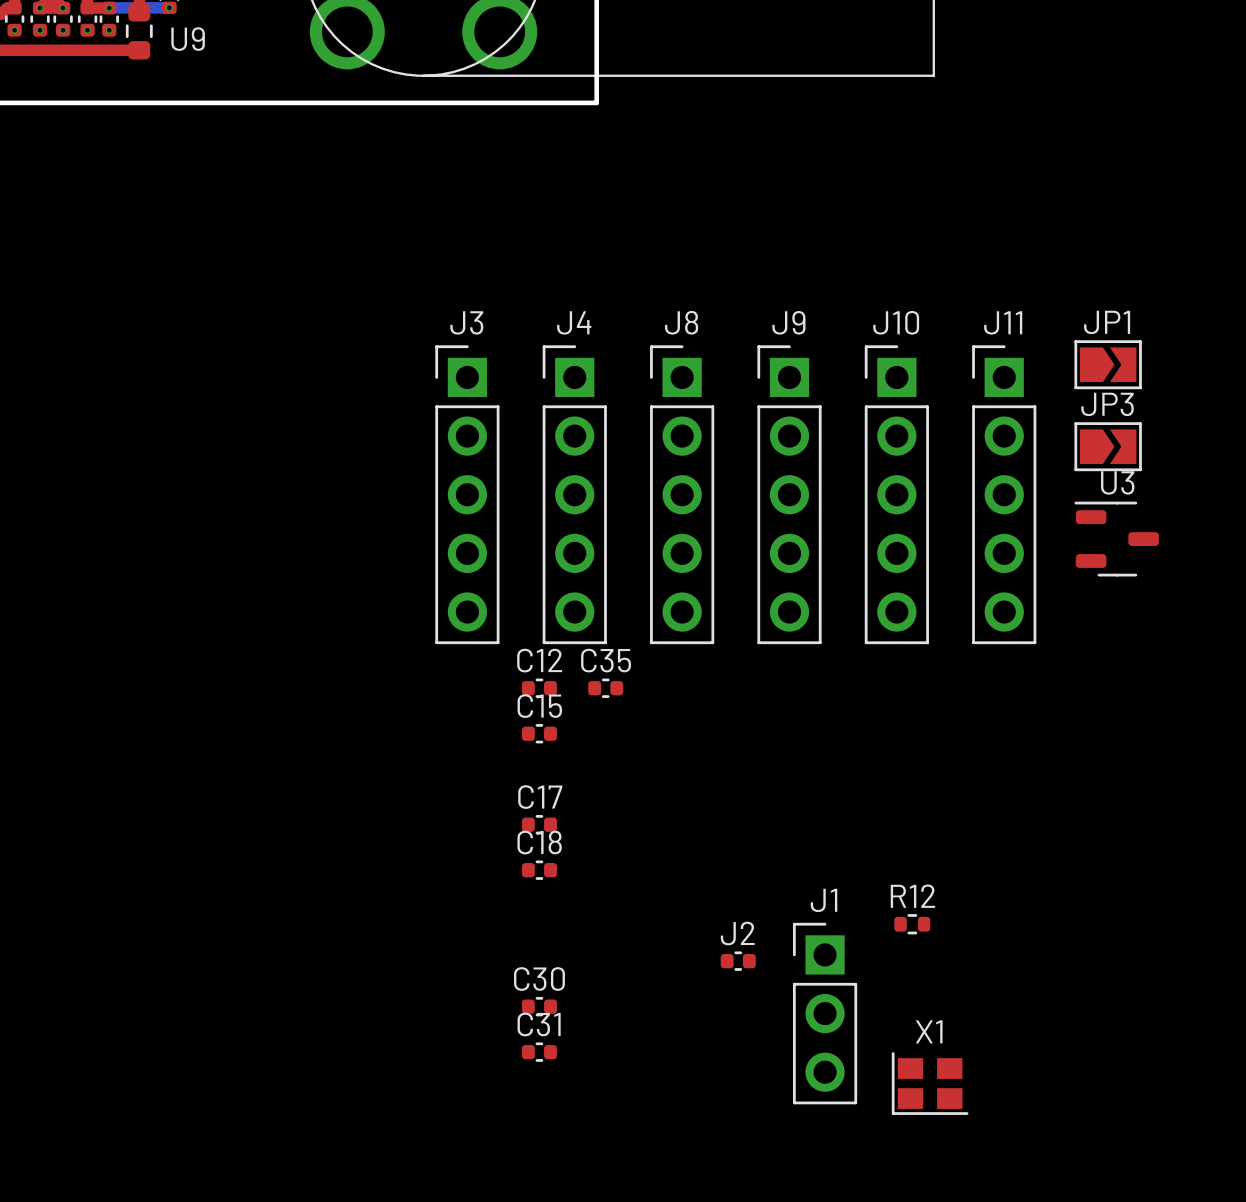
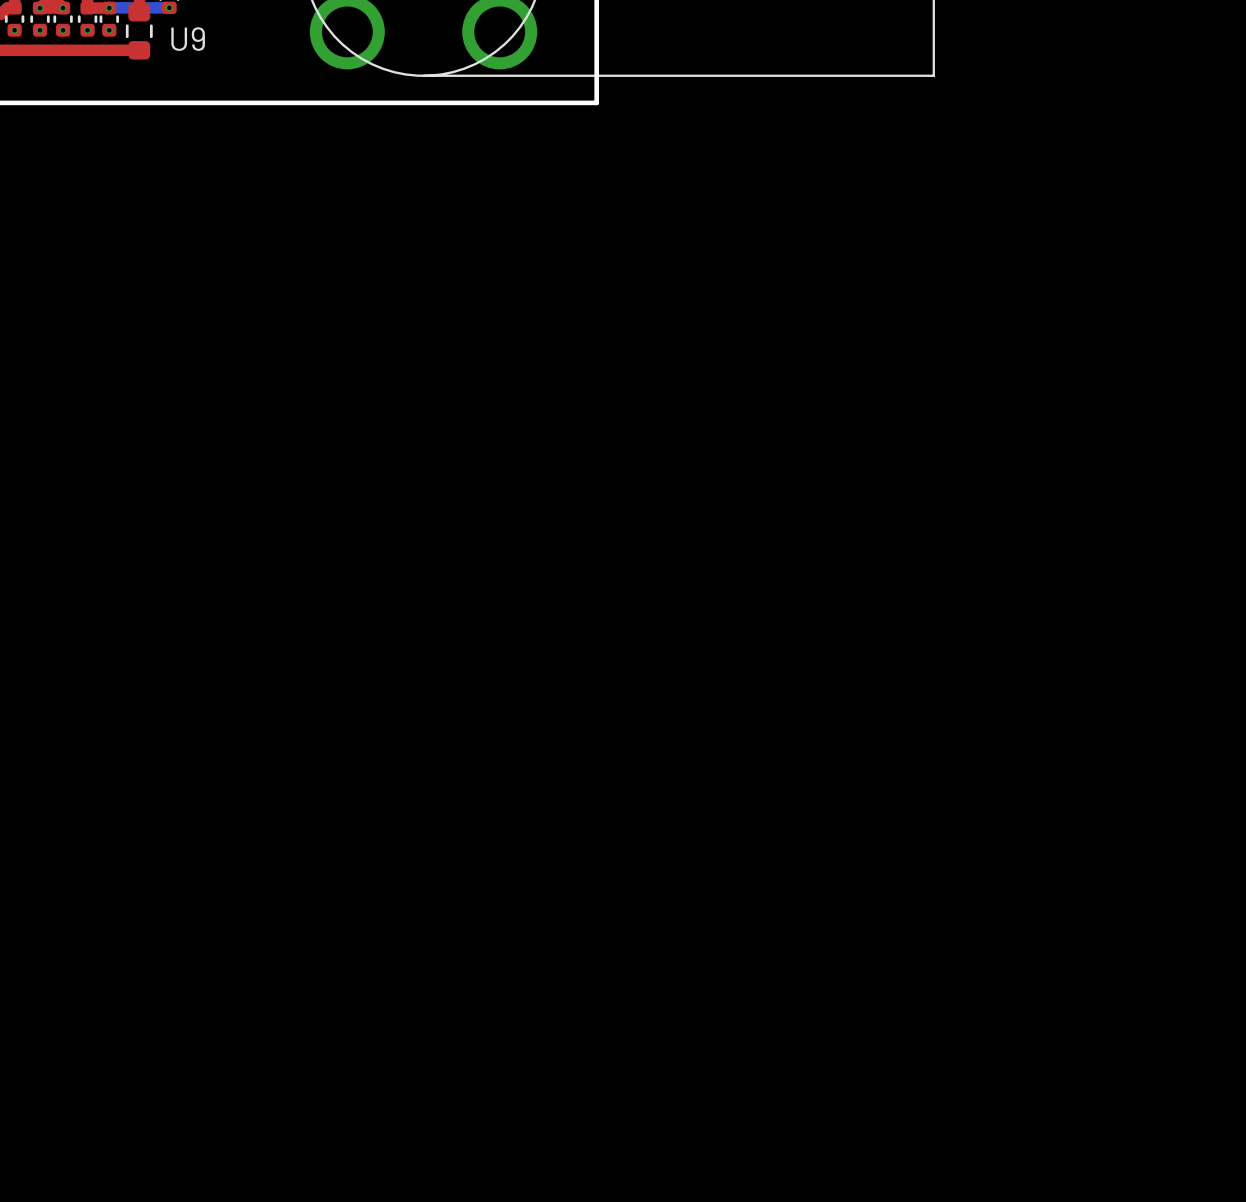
JP1: (1108, 364) -> none
JP3: (1108, 446) -> none
J3: (467, 494) -> none
J4: (574, 494) -> none
J8: (682, 494) -> none
J9: (789, 494) -> none
J10: (896, 494) -> none
J11: (1004, 494) -> none
U3: (1116, 539) -> none
C12: (539, 688) -> none
C35: (605, 688) -> none
C15: (539, 733) -> none
C17: (539, 824) -> none
C18: (539, 870) -> none
R12: (912, 924) -> none
J2: (738, 961) -> none
C30: (539, 1006) -> none
J1: (825, 1013) -> none
C31: (539, 1052) -> none
X1: (930, 1083) -> none

